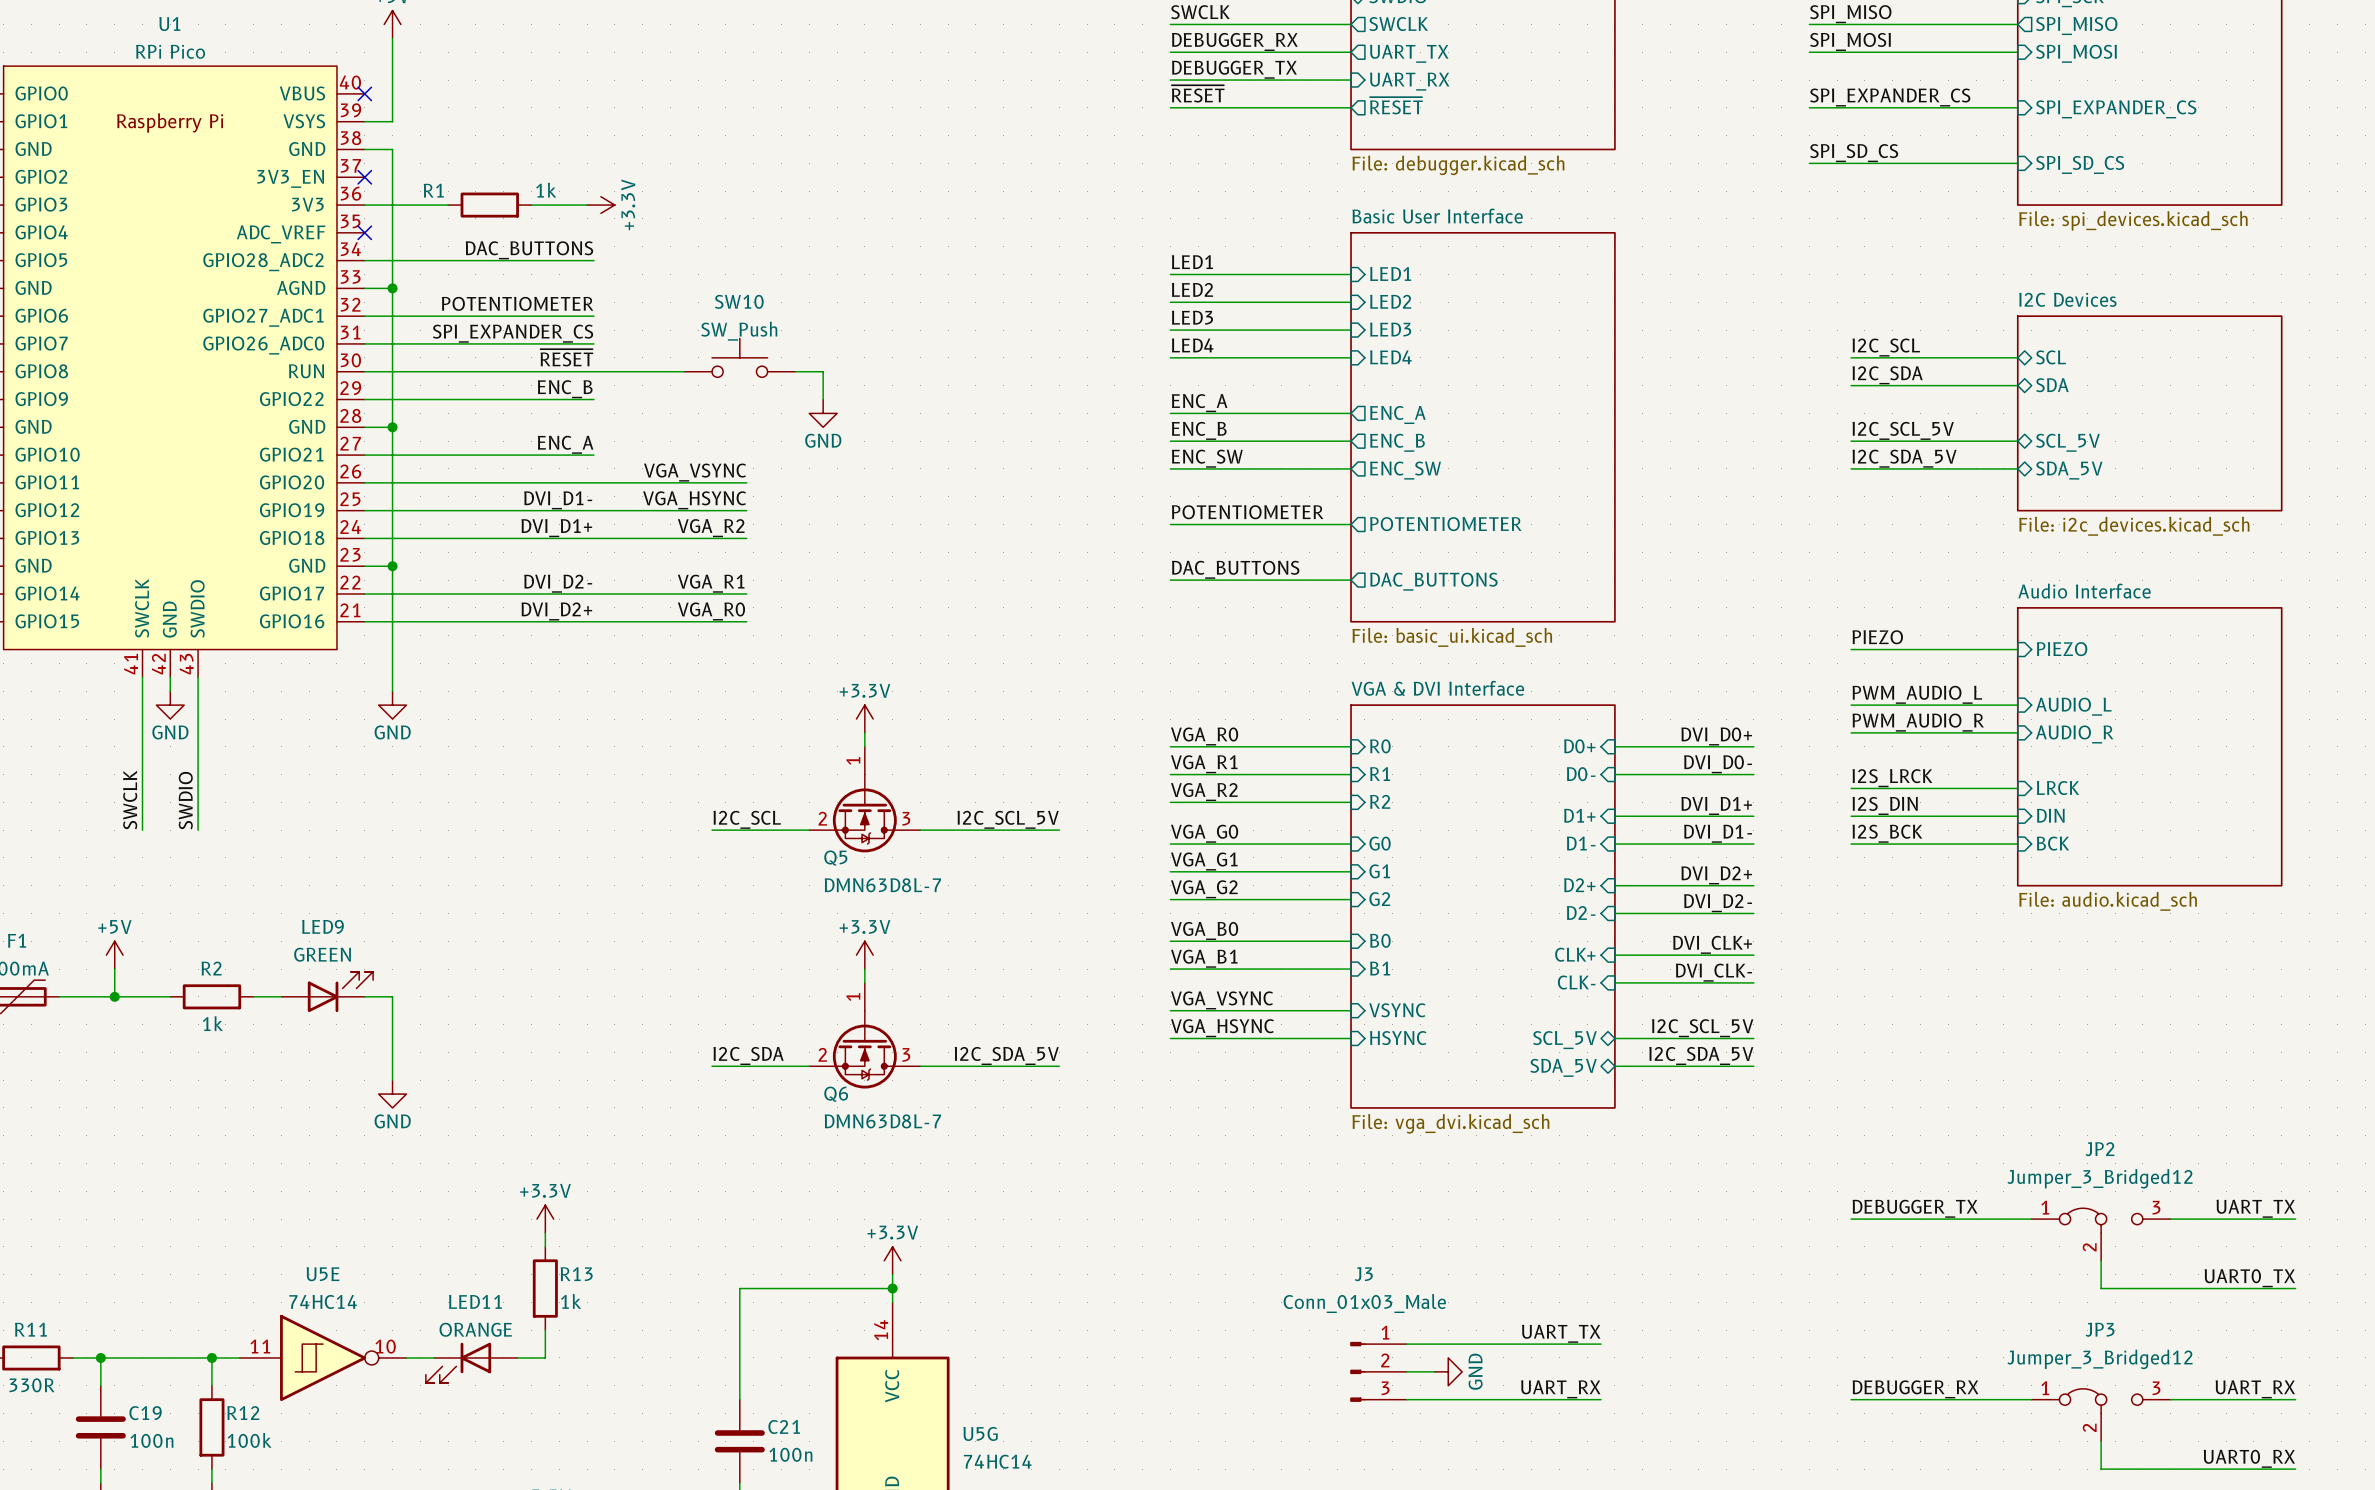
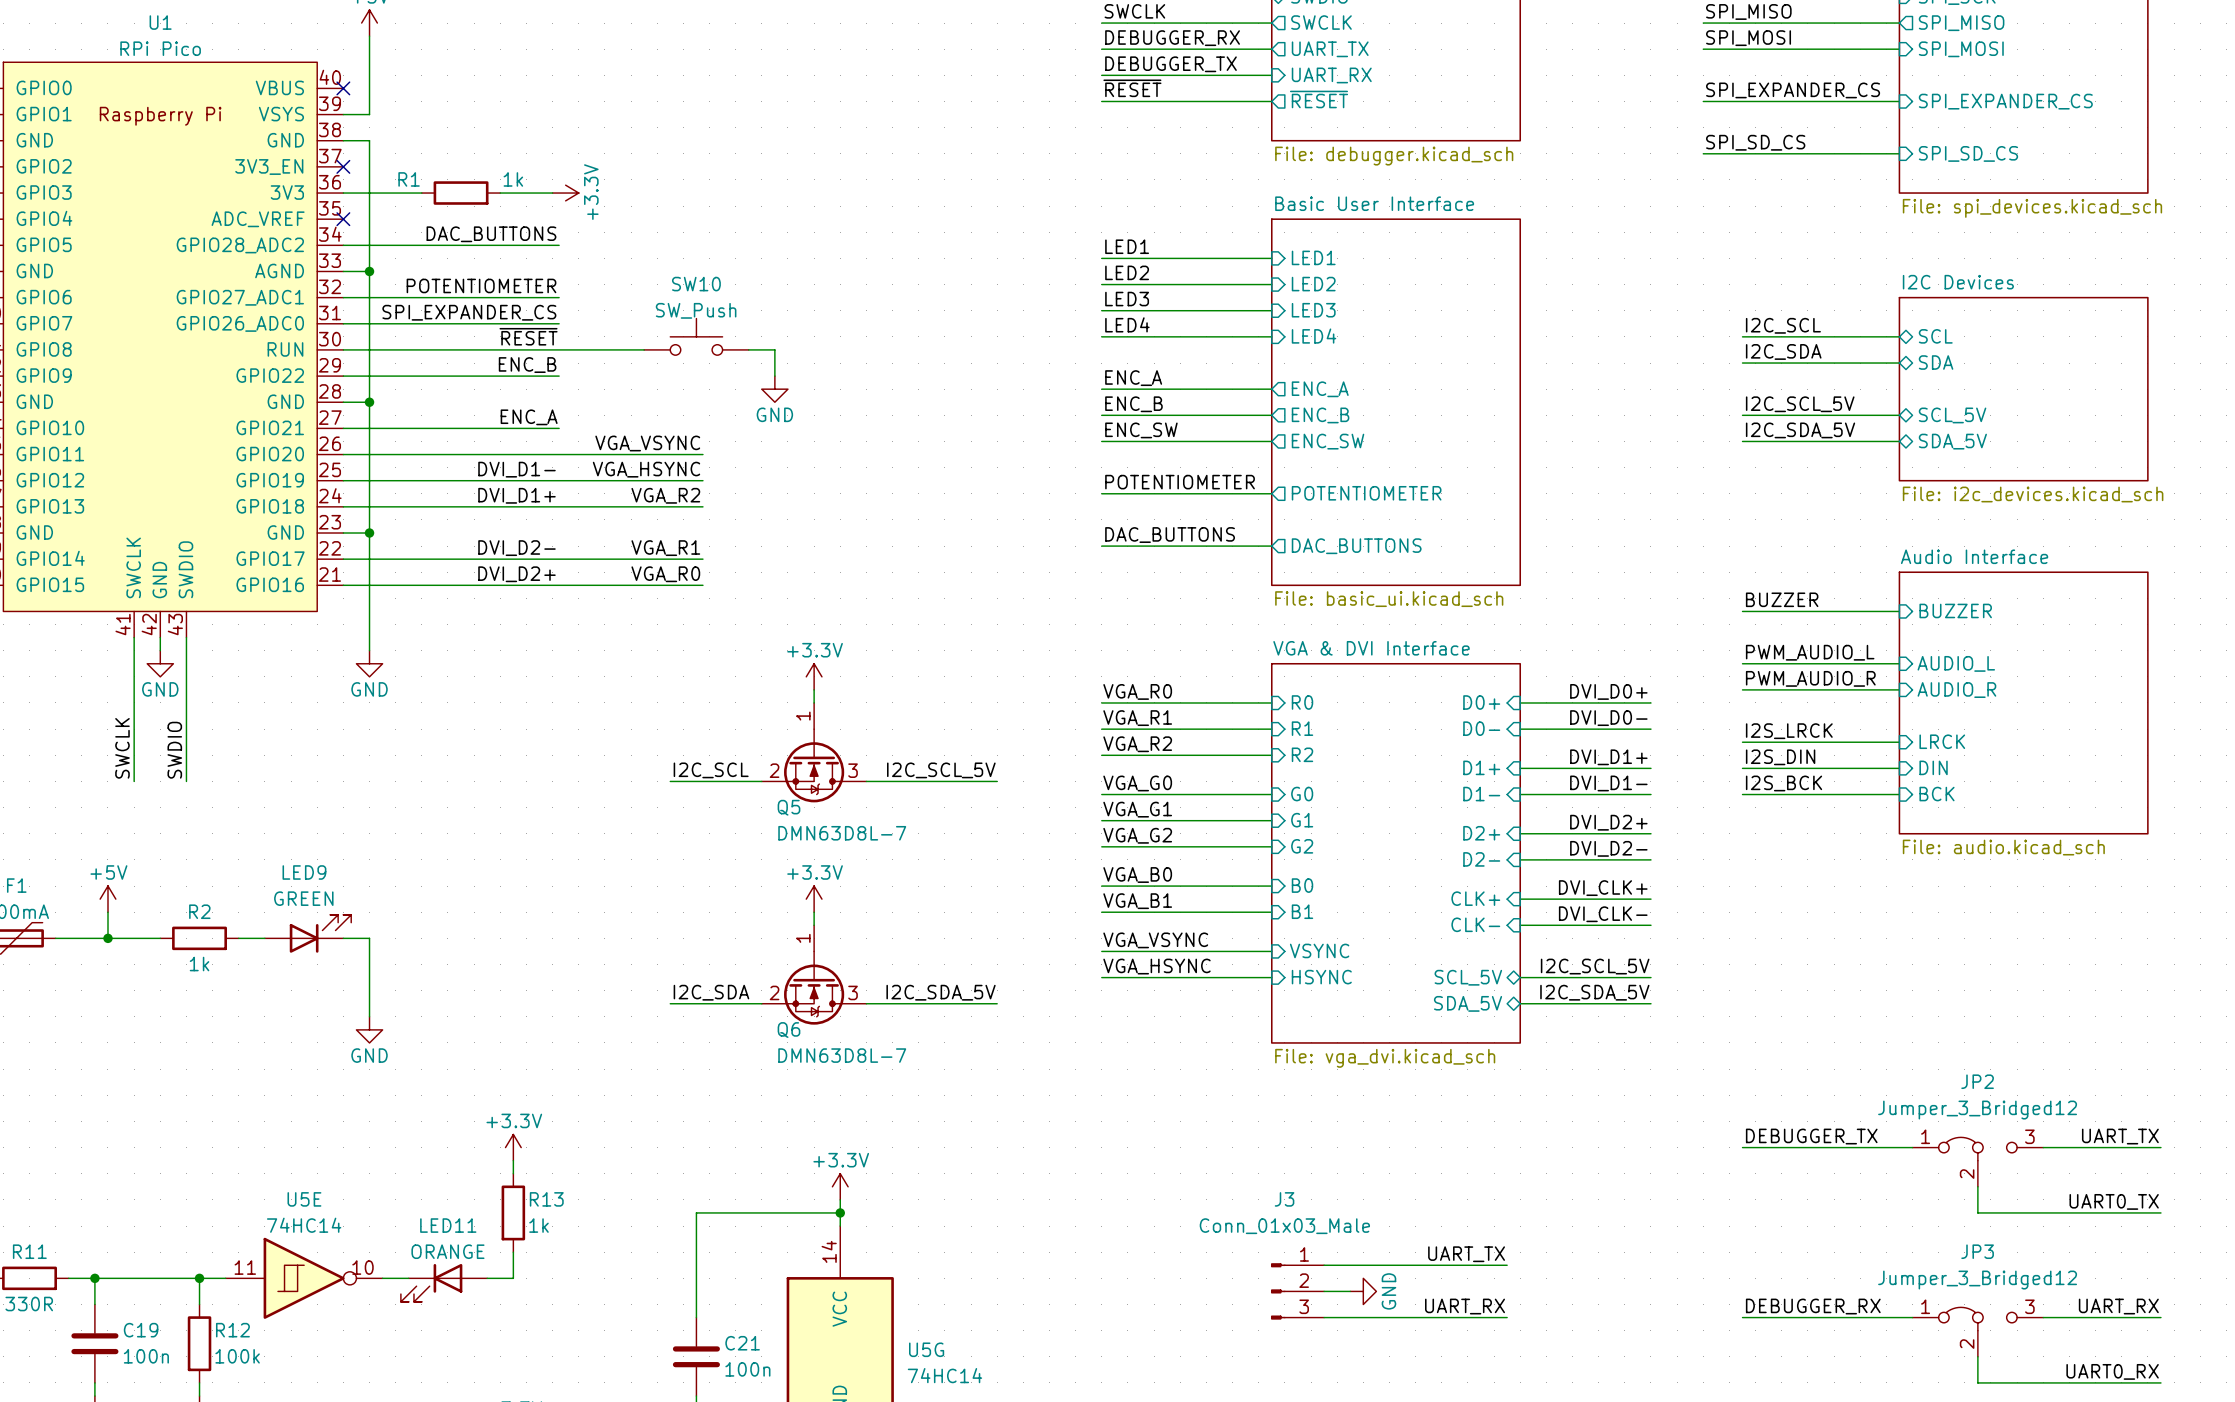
label: PIEZO (1877, 637) -> BUZZER (1782, 599)
sheet pin: PIEZO (2062, 649) -> BUZZER (1955, 610)

